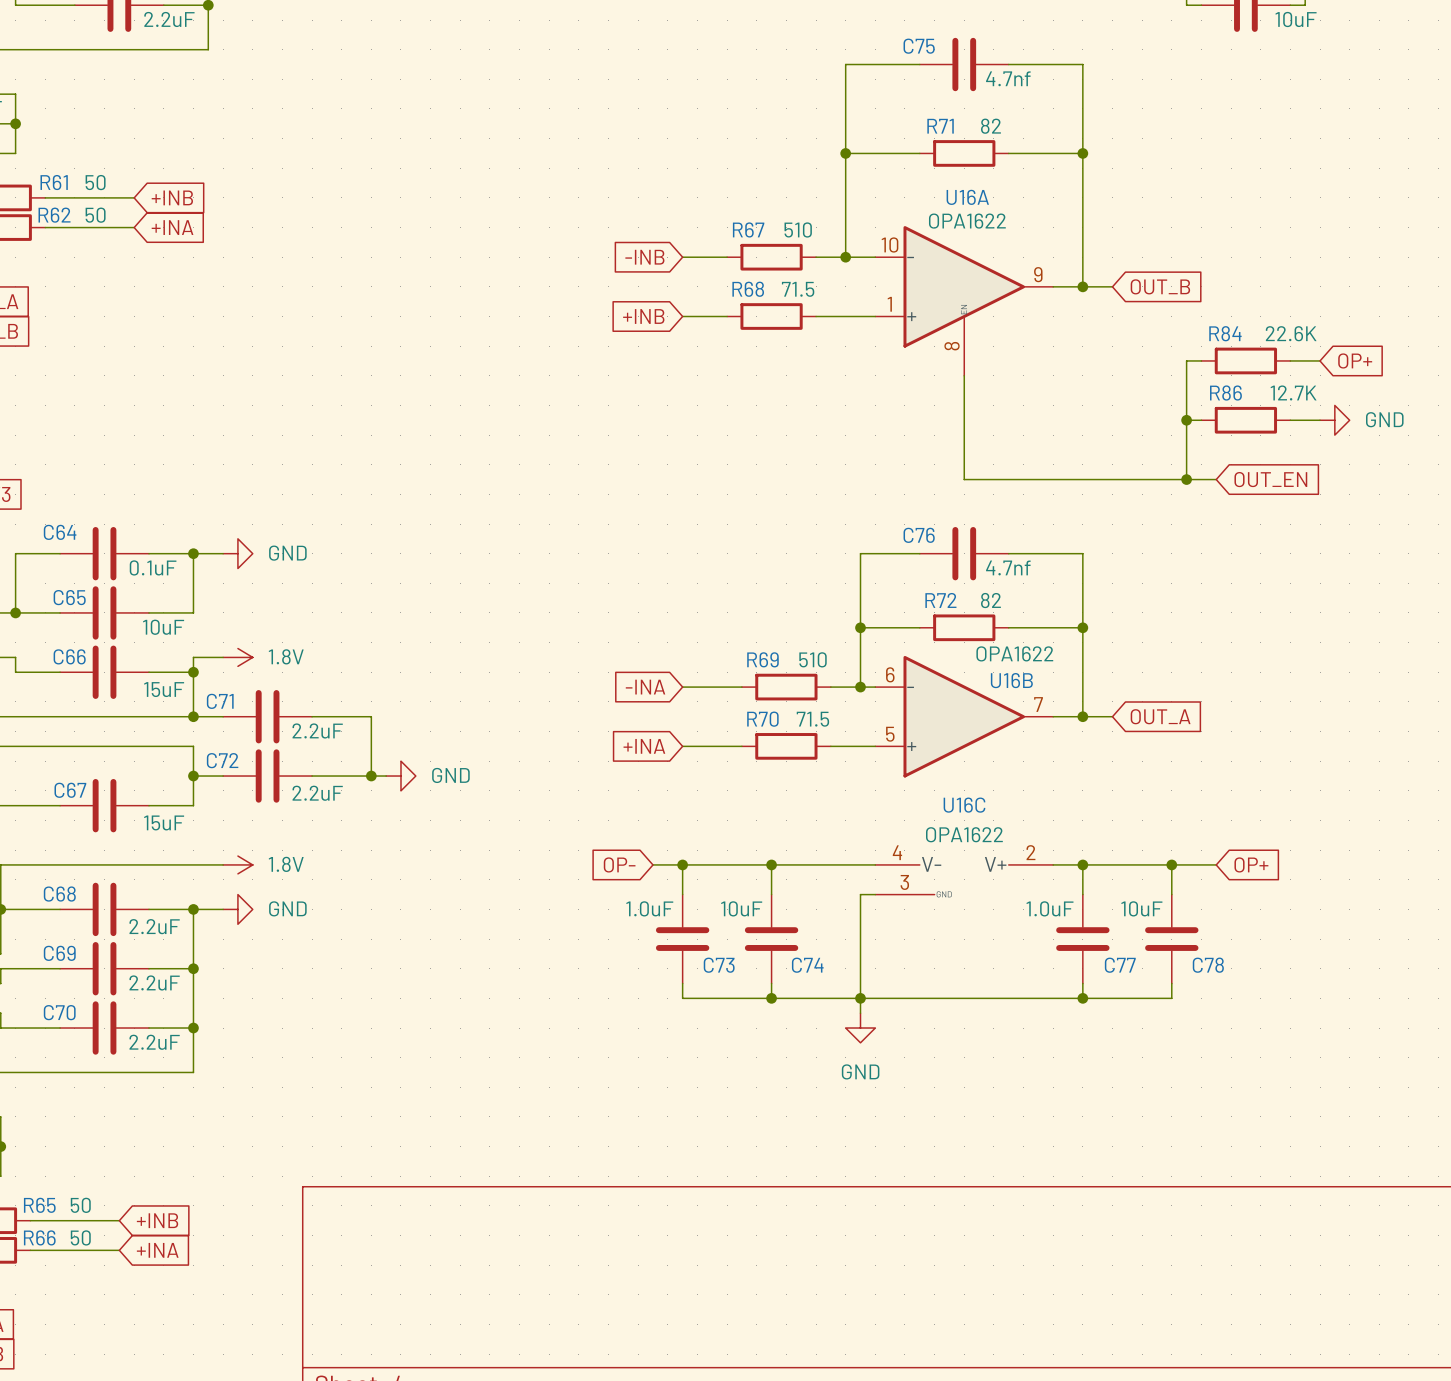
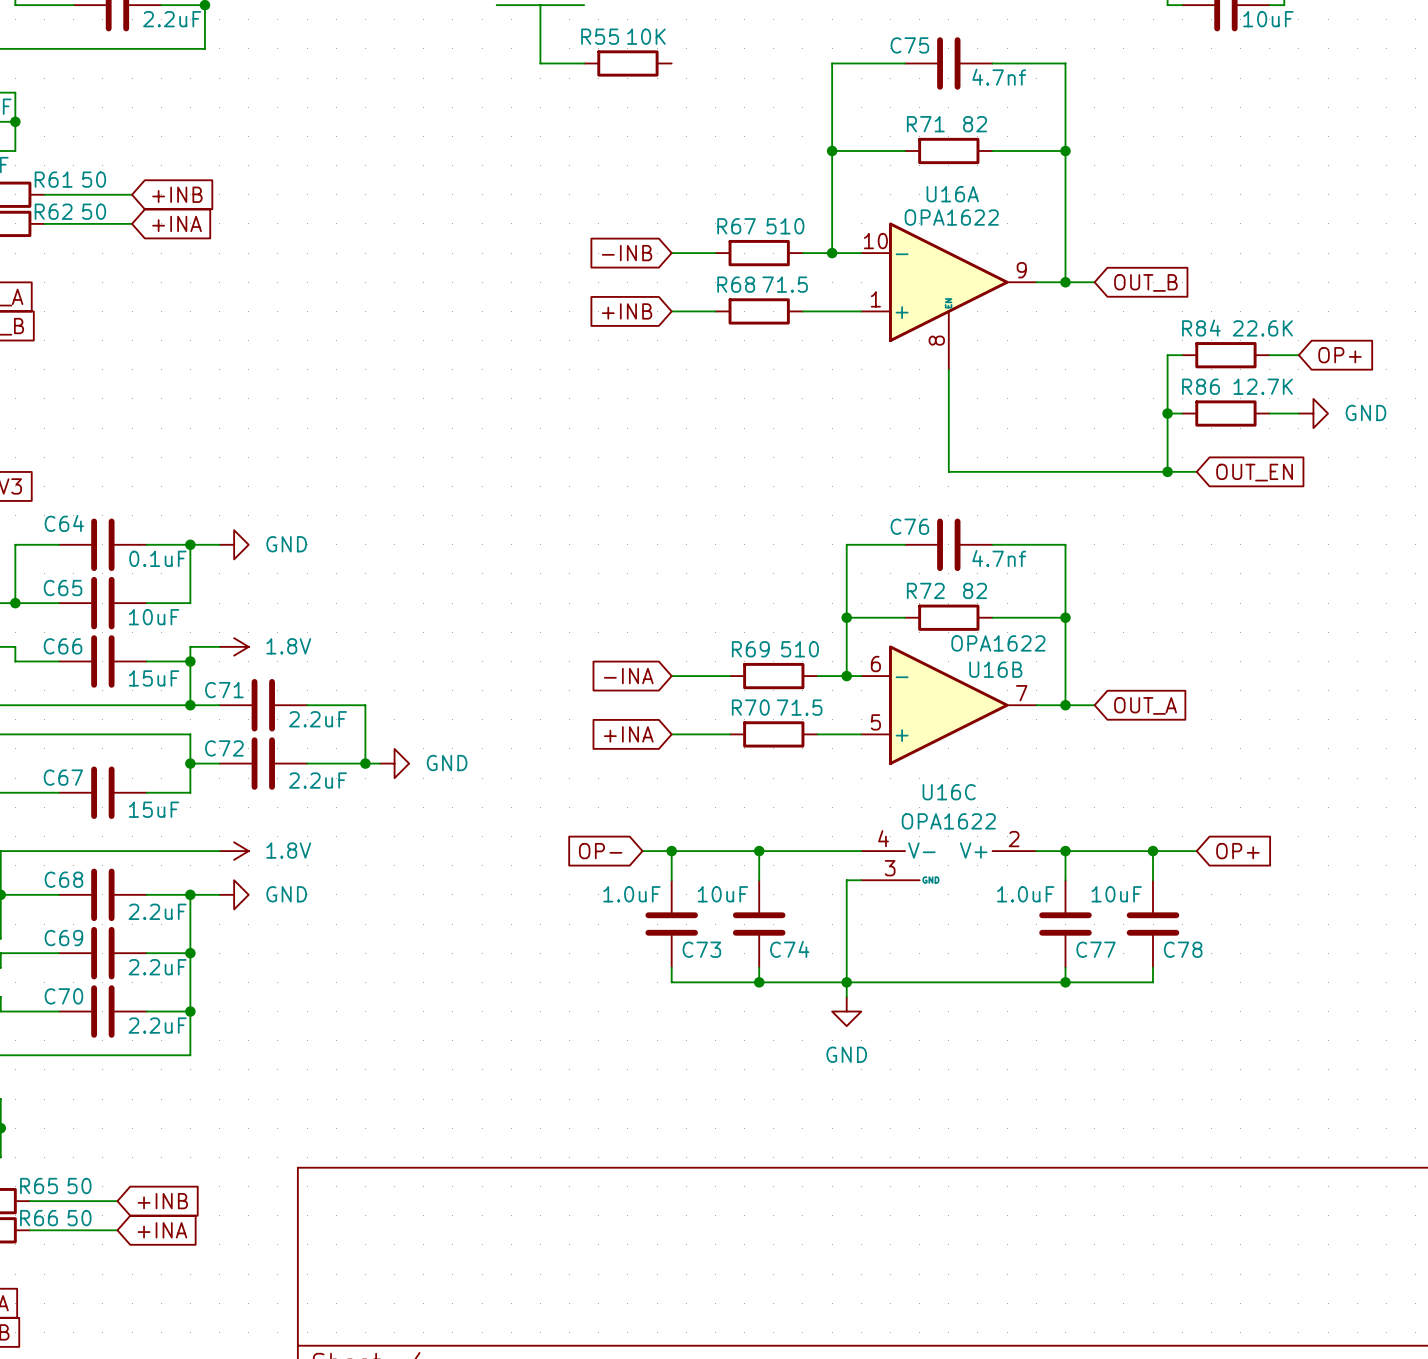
wire: none -> (496, 5) (584, 5)
wire: none -> (540, 5) (540, 63) (584, 63)
R55: none -> 10K (627, 63)

